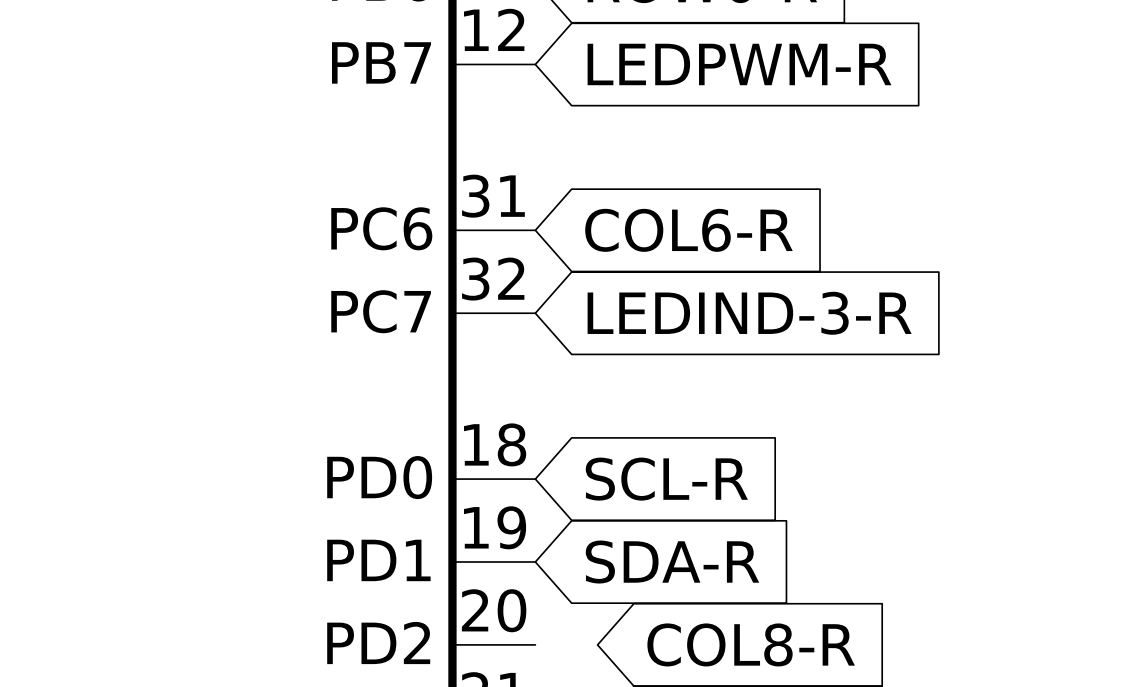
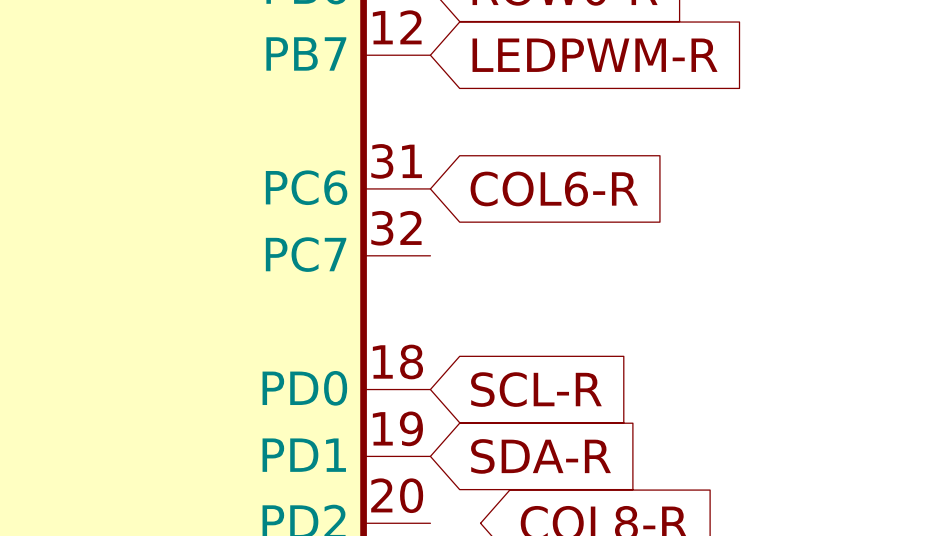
global label: LEDIND-3-R (749, 313) -> none

